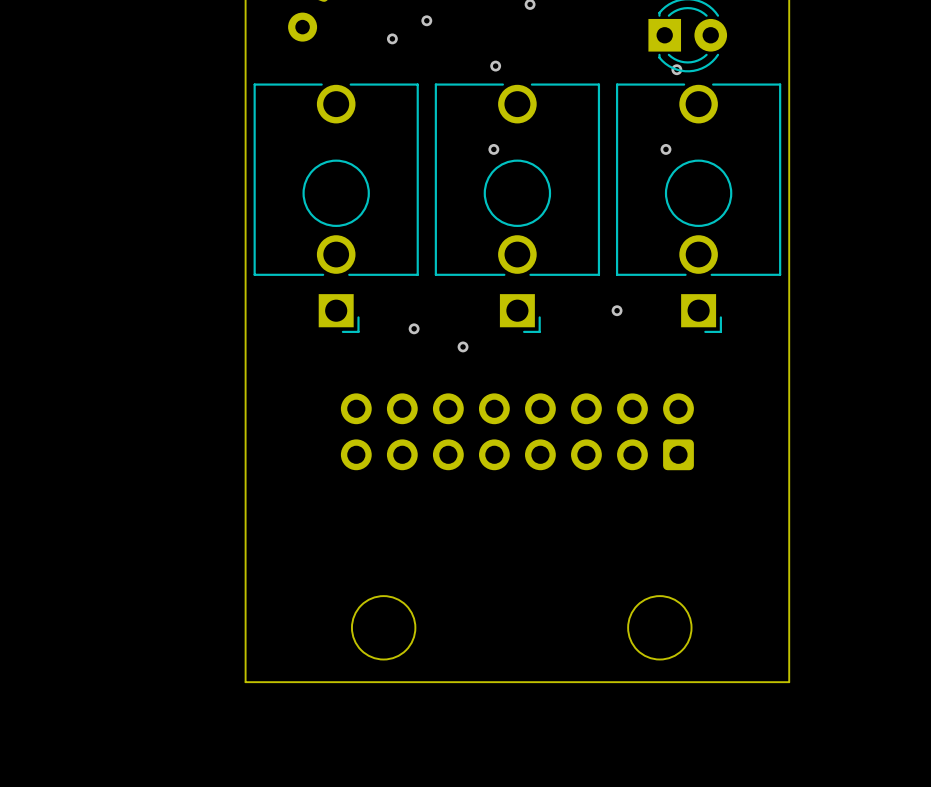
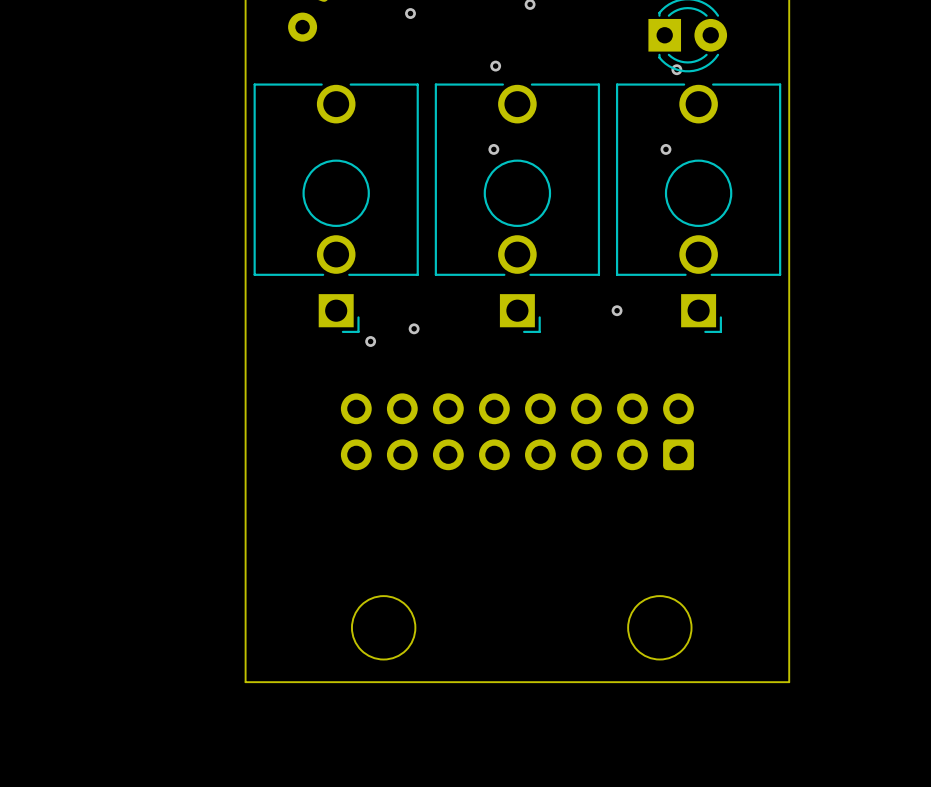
via: none -> (410, 13)
via: (426, 20) -> none
via: (392, 38) -> none
via position: (463, 346) -> (370, 341)

